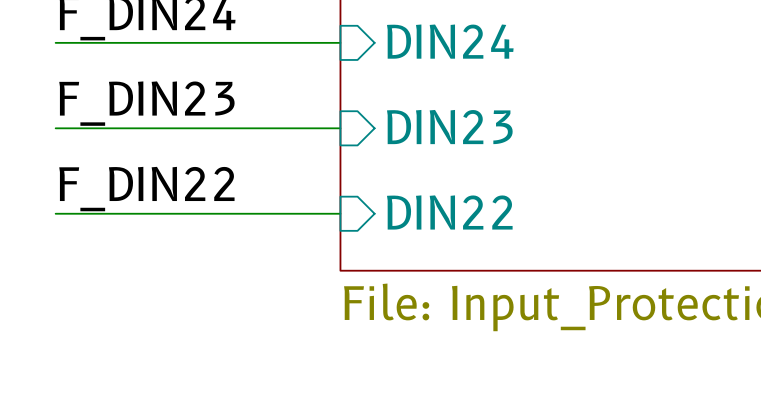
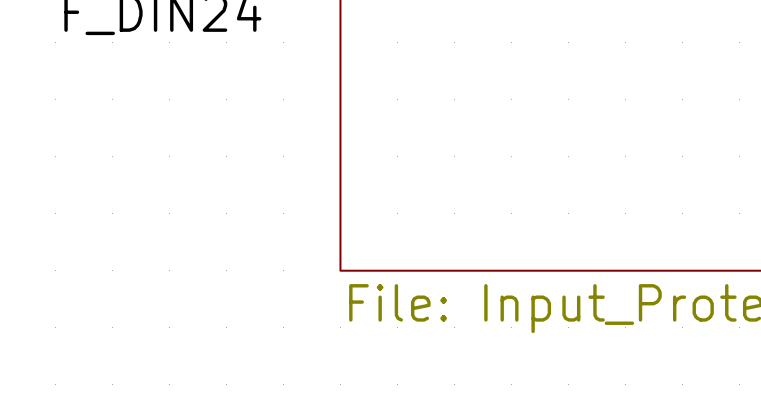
sheet pin: DIN24 (450, 41) -> none
wire: (55, 42) (340, 42) -> none
label: F_DIN23 (146, 103) -> none
sheet pin: DIN23 (449, 127) -> none
wire: (55, 128) (340, 128) -> none
label: F_DIN22 (146, 189) -> none
sheet pin: DIN22 (449, 212) -> none
wire: (55, 213) (340, 213) -> none

